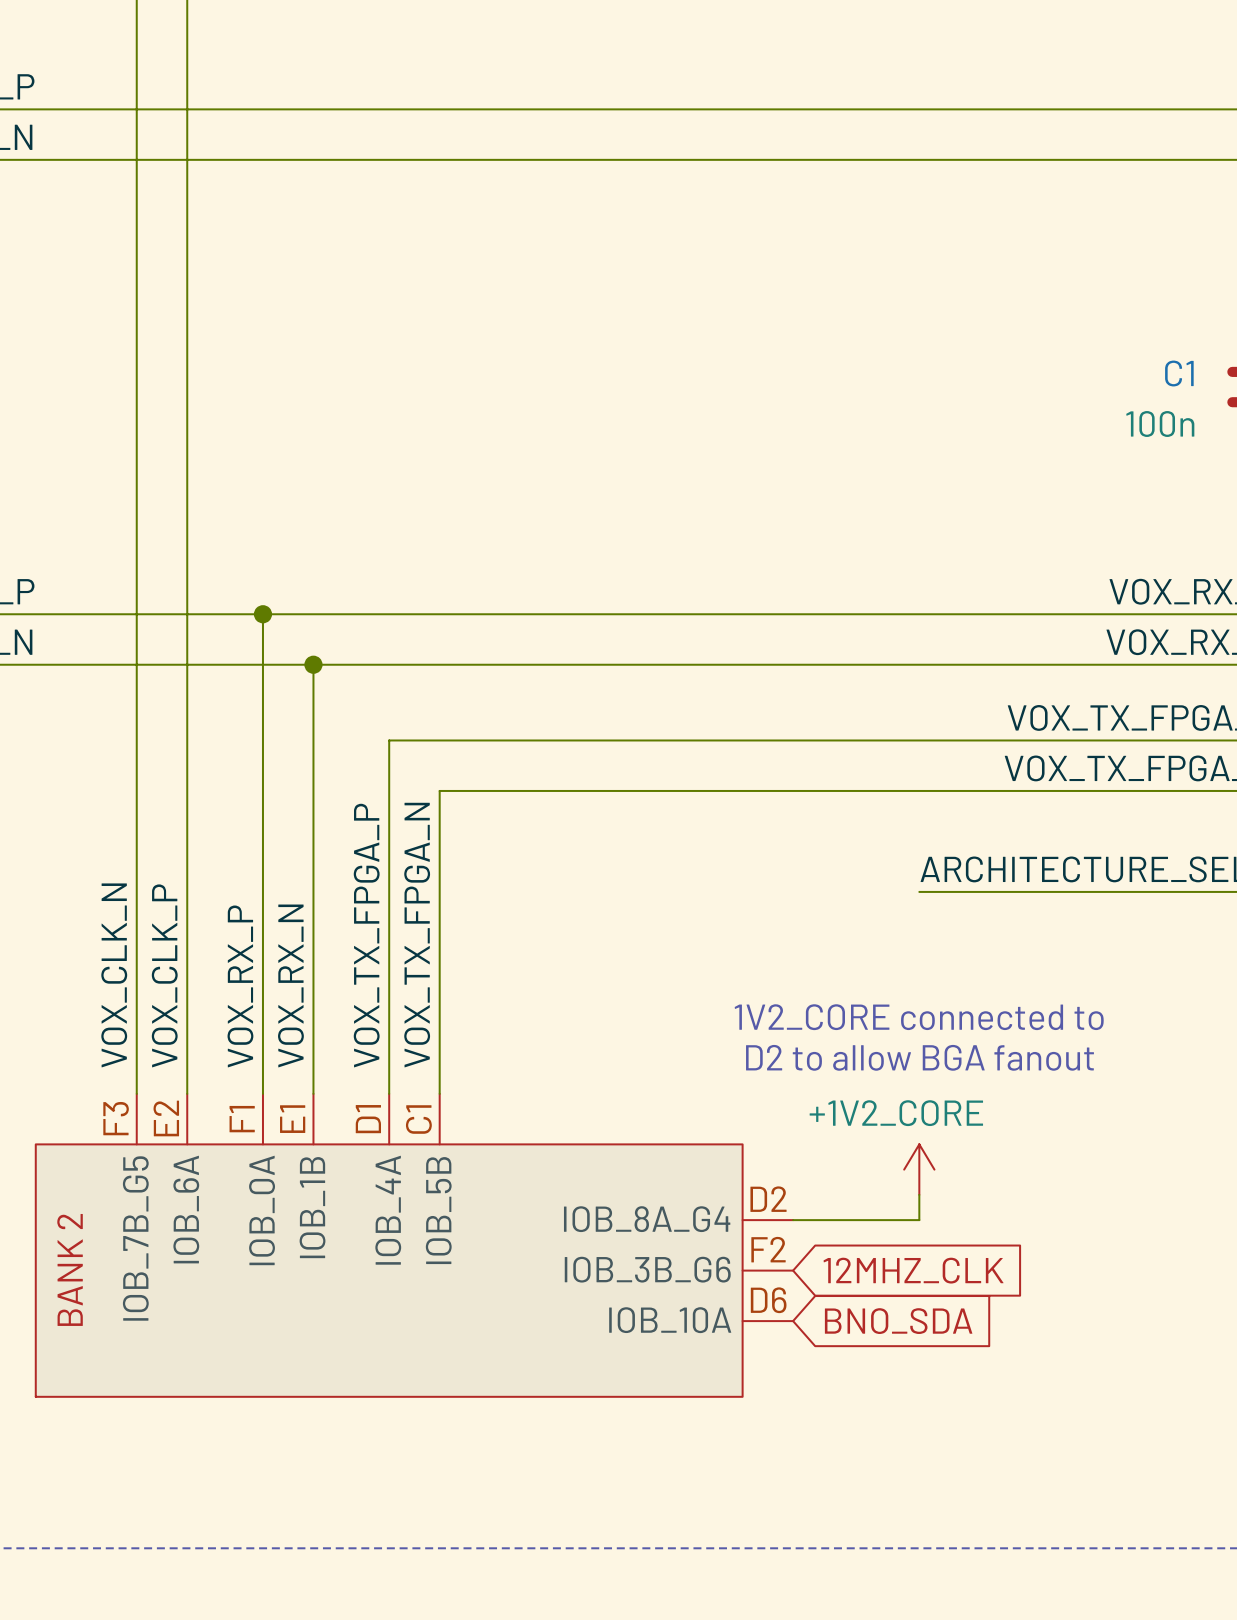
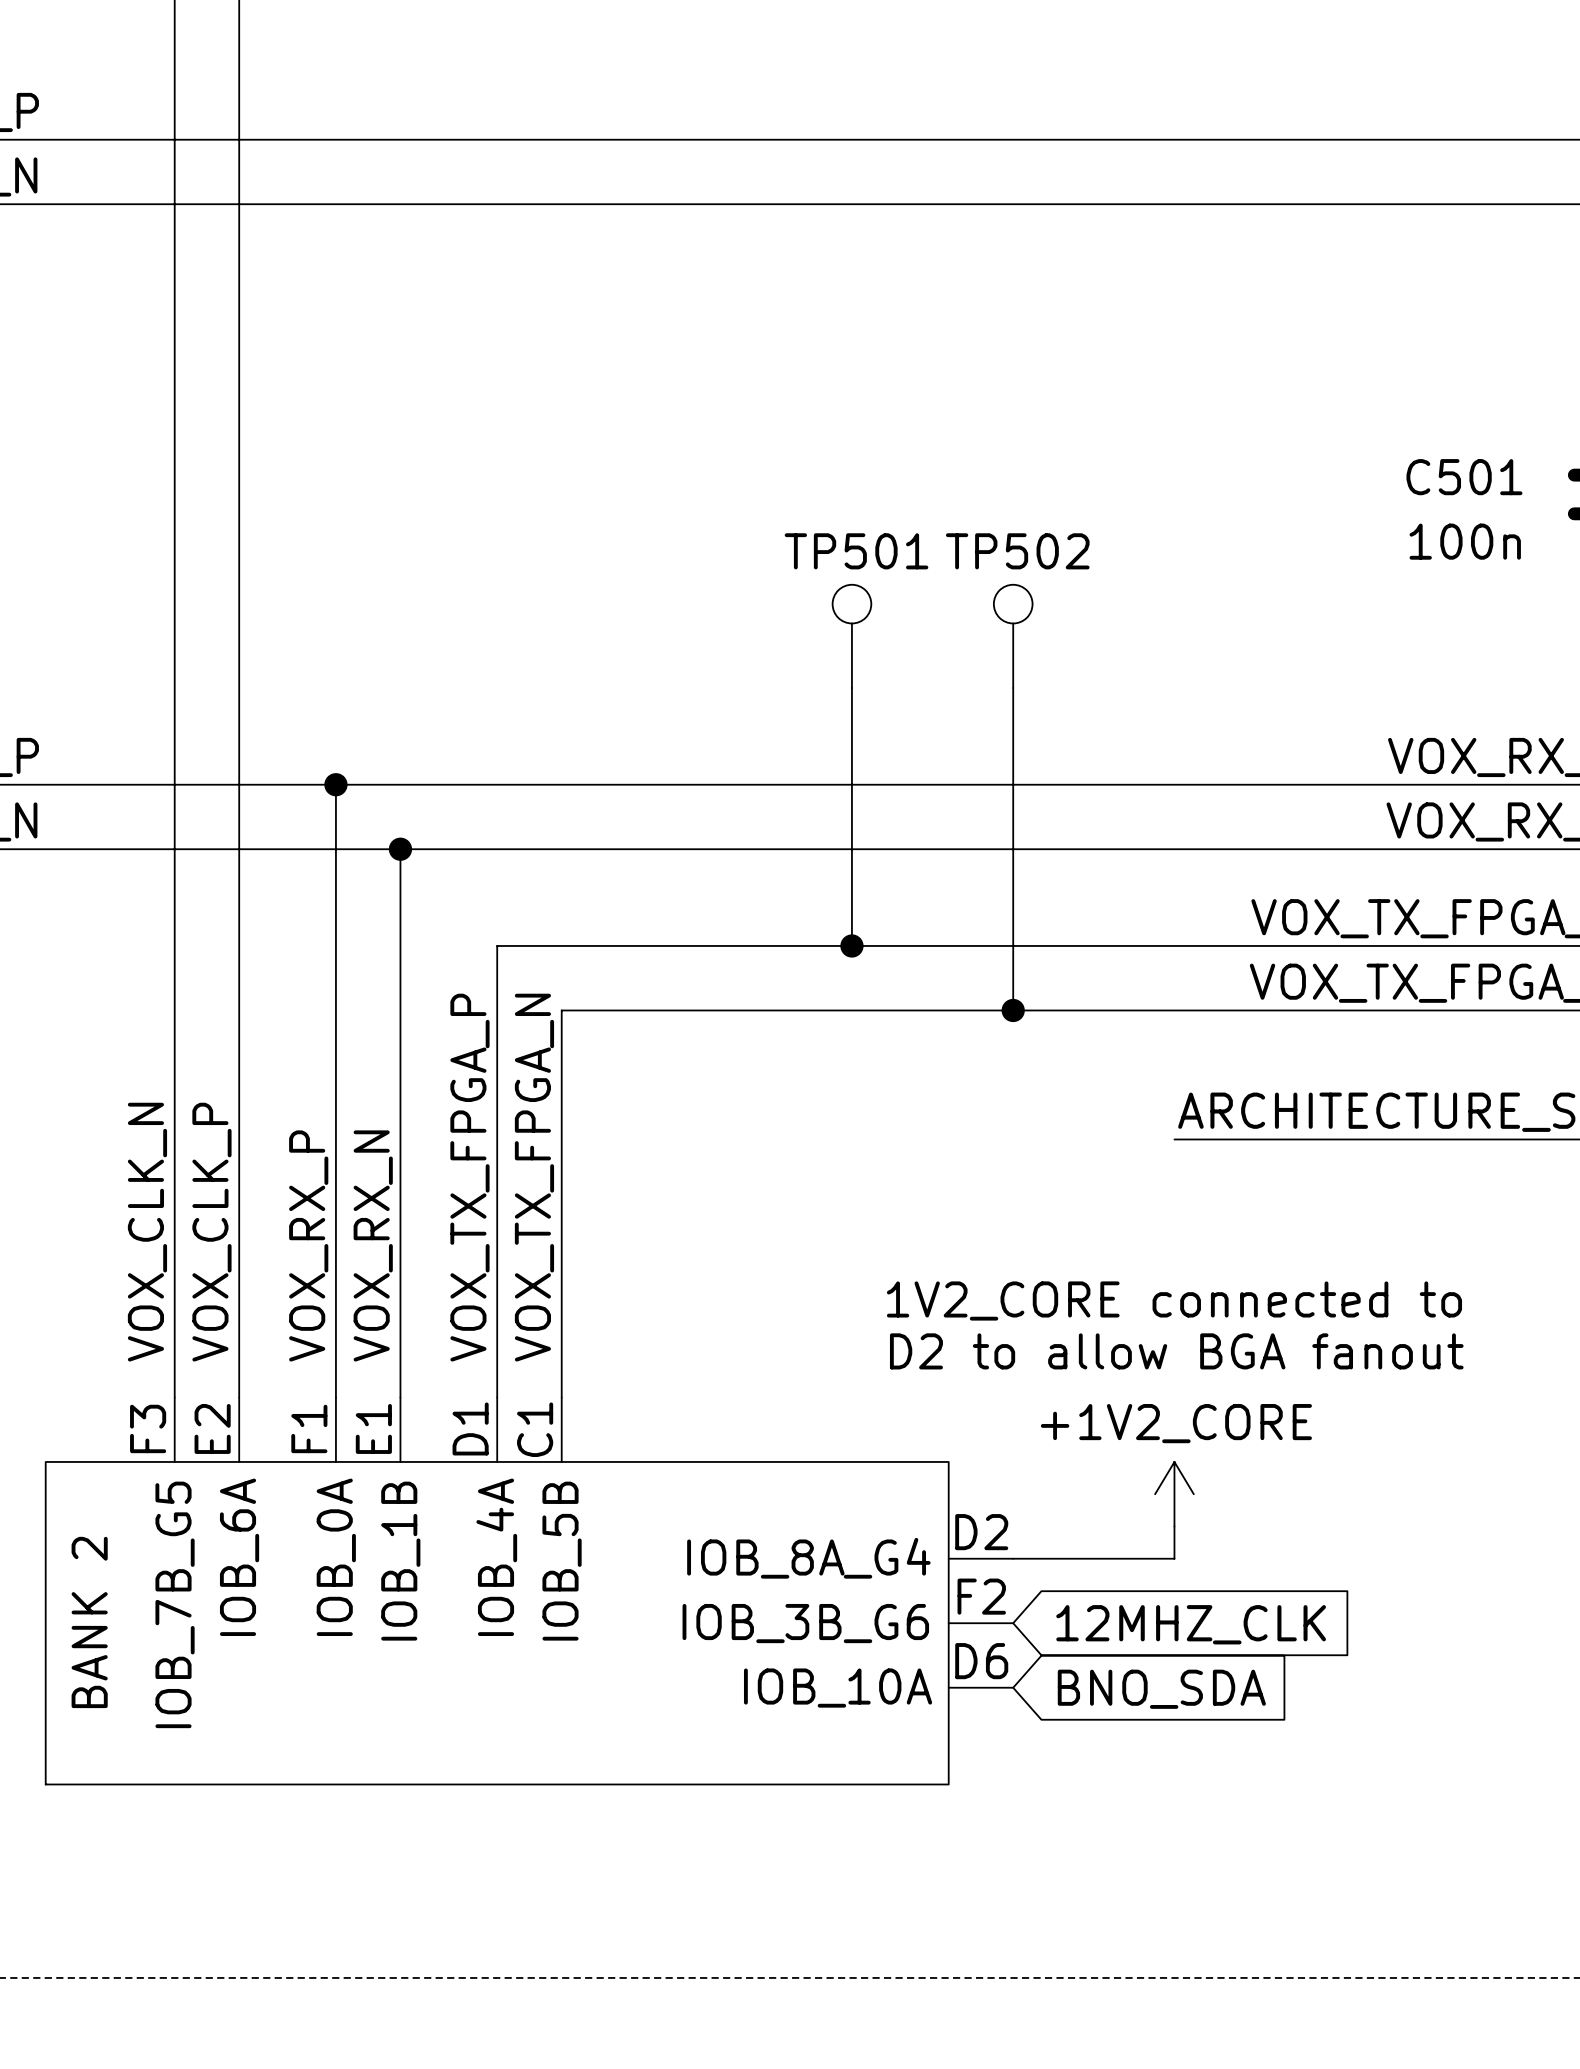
C1 name: C1 (1179, 373) -> C501 (1464, 477)
TP501: none -> (851, 636)
TP502: none -> (1013, 636)
wire: none -> (851, 687) (851, 945)
wire: none -> (1013, 687) (1013, 1010)
junction: none -> (851, 945)
junction: none -> (1013, 1010)

